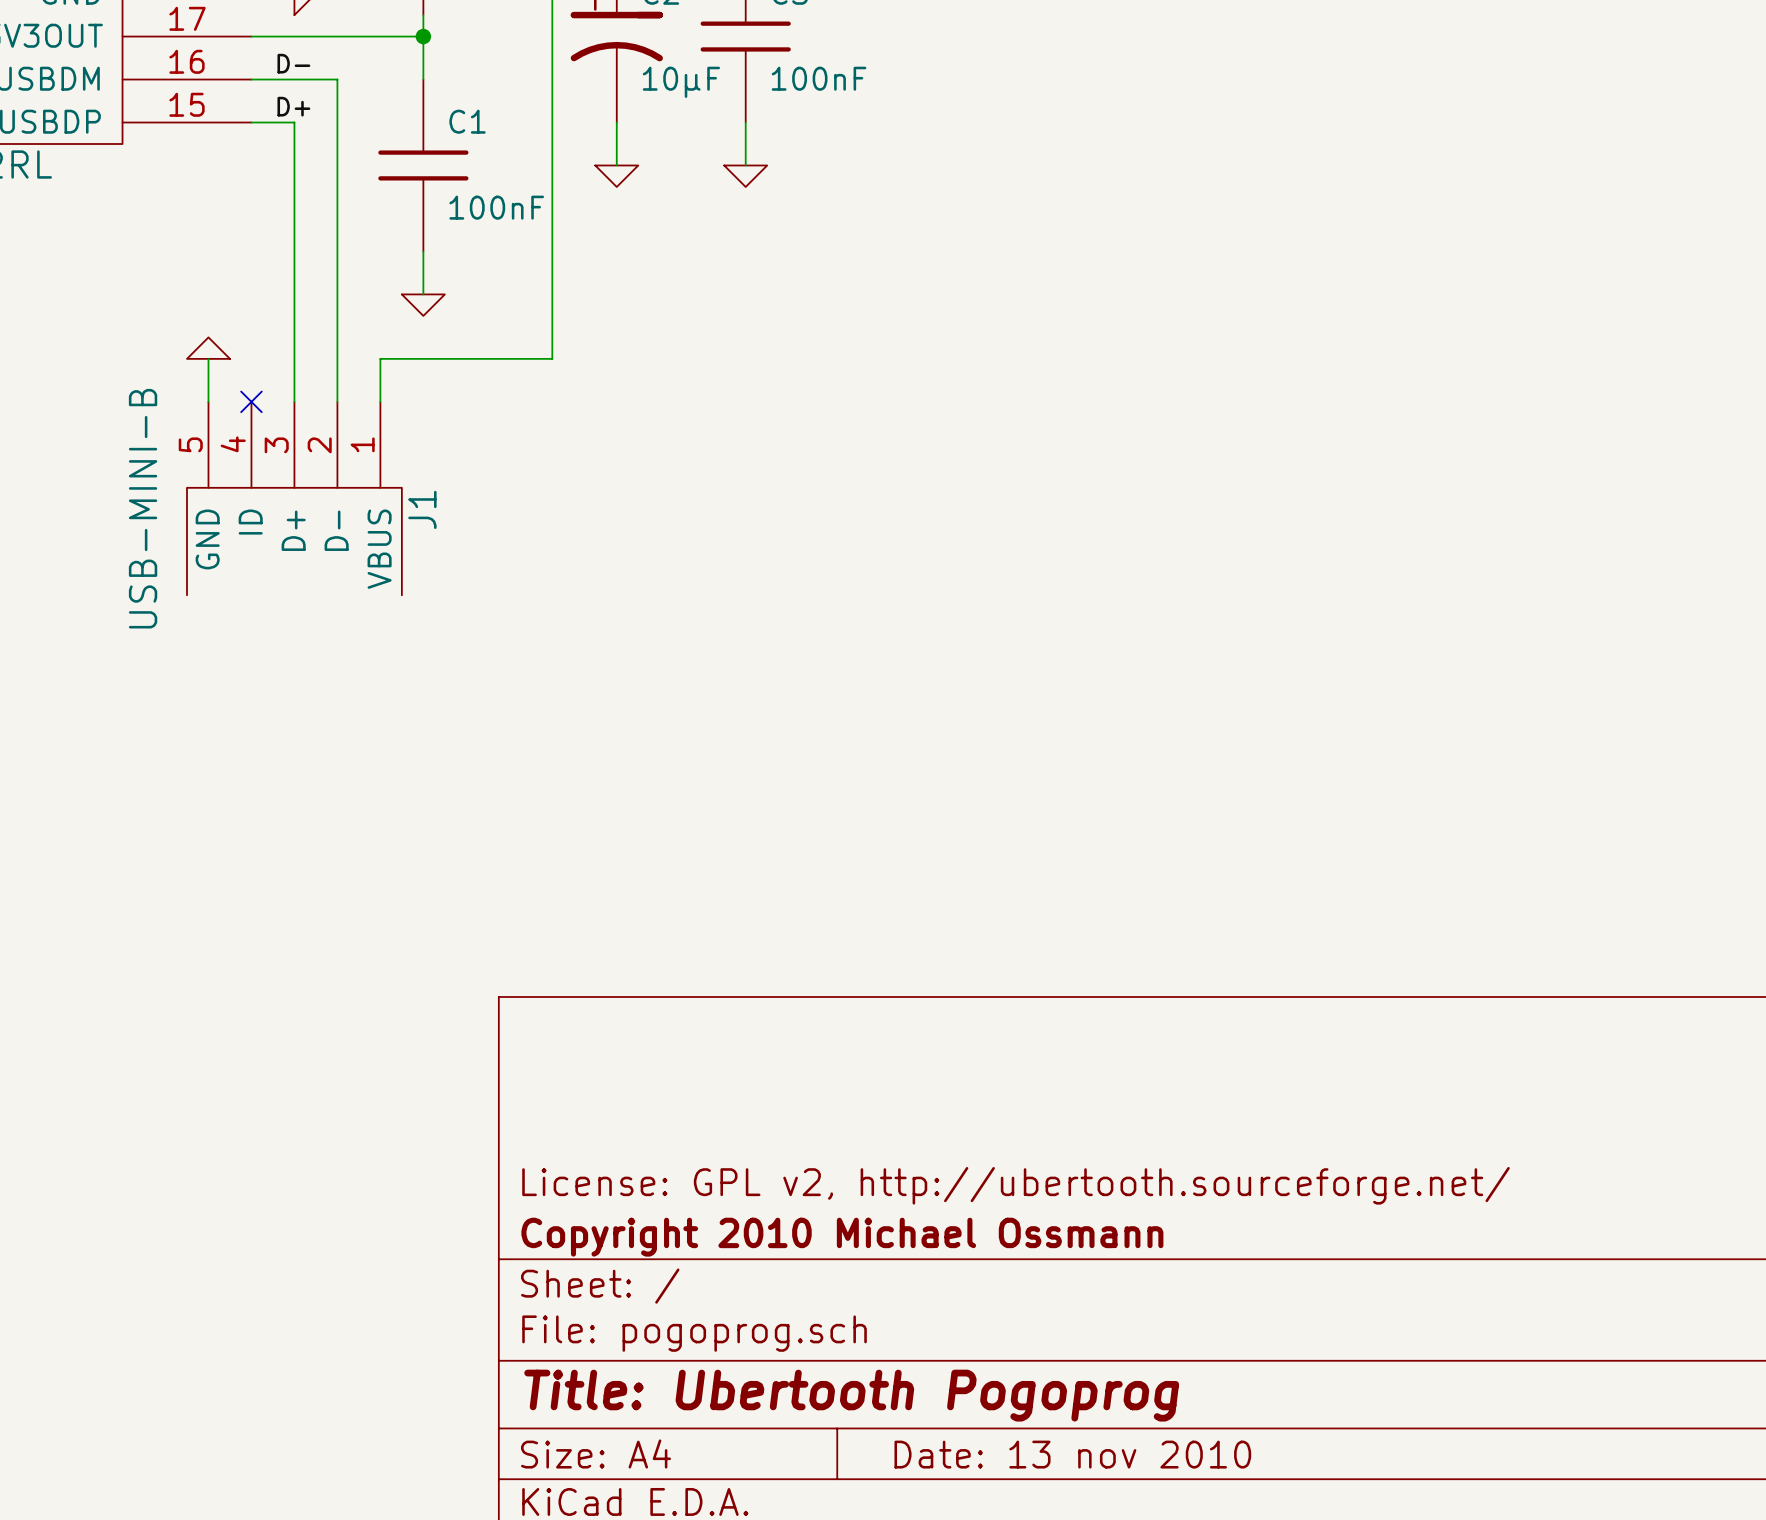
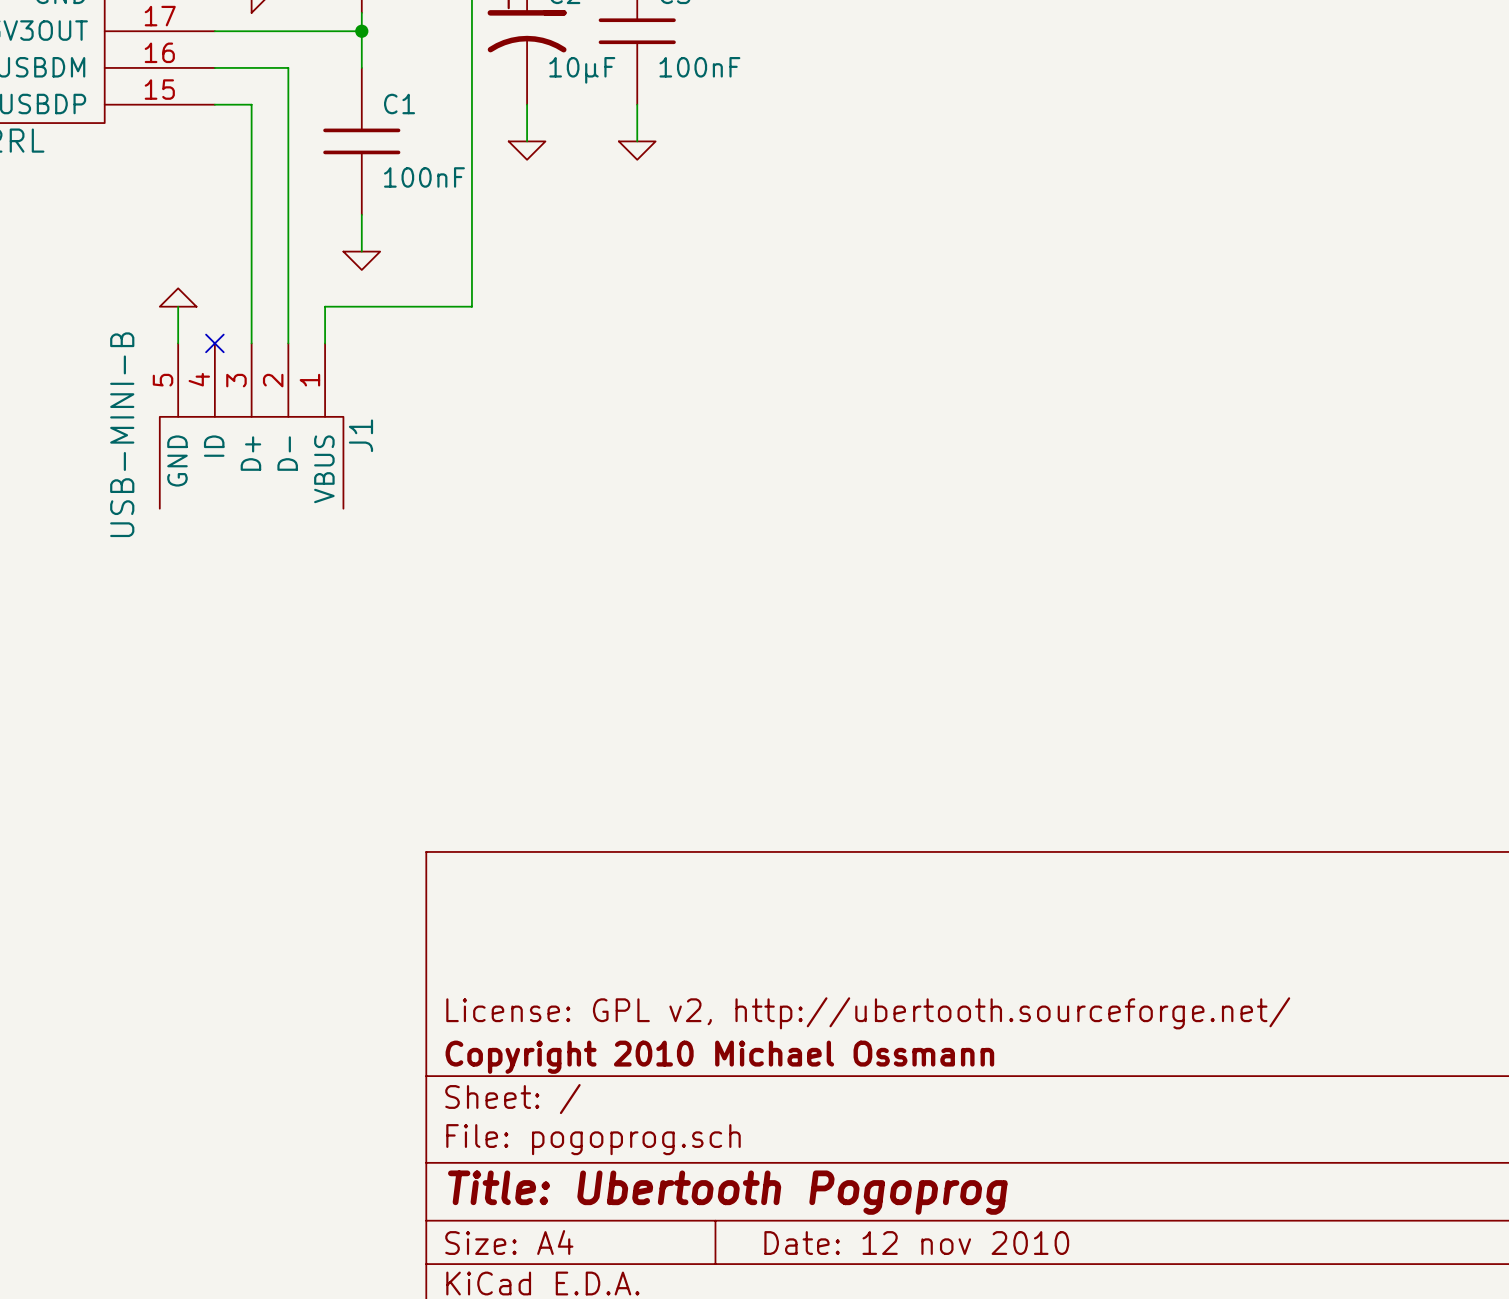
label: D- (293, 63) -> none
label: D+ (293, 106) -> none
title block: Date: 13 nov 2010 (1072, 1454) -> Date: 12 nov 2010 (916, 1243)

